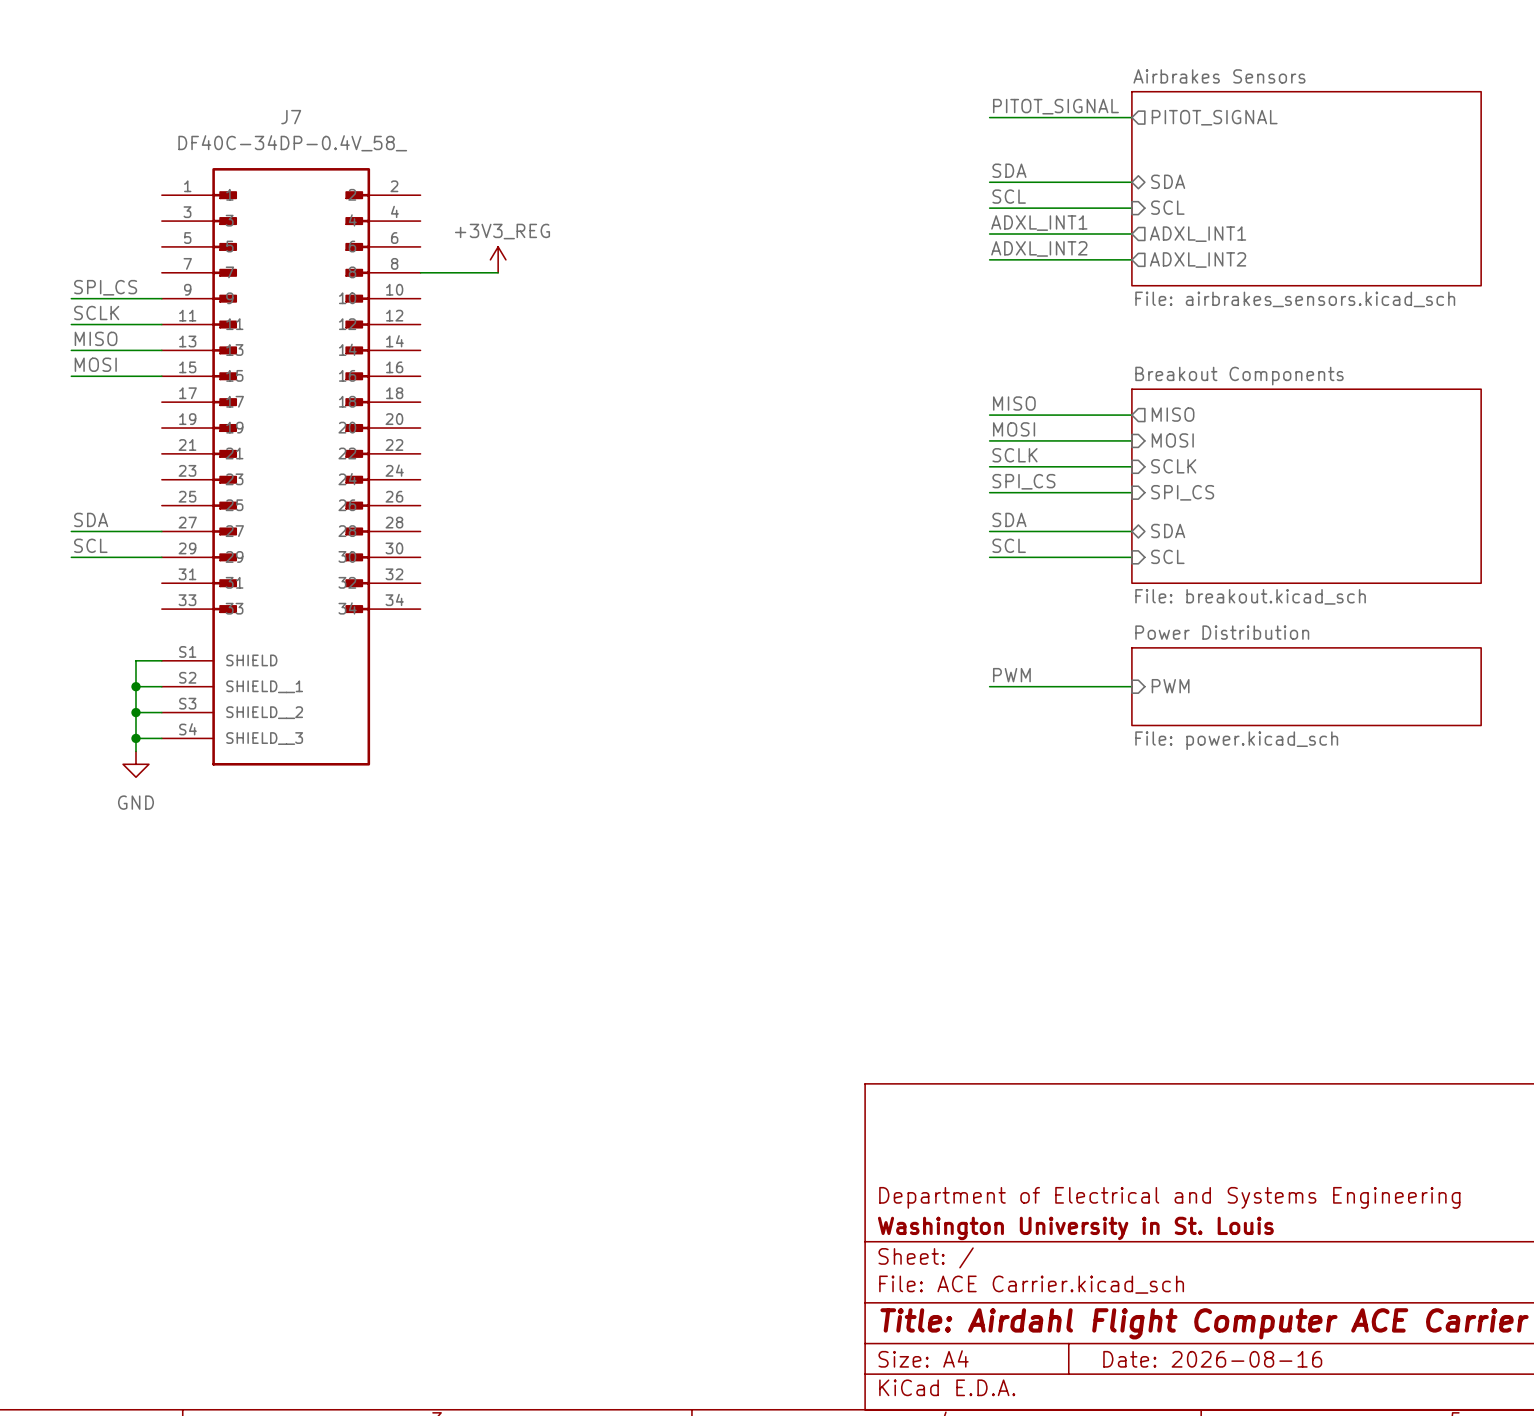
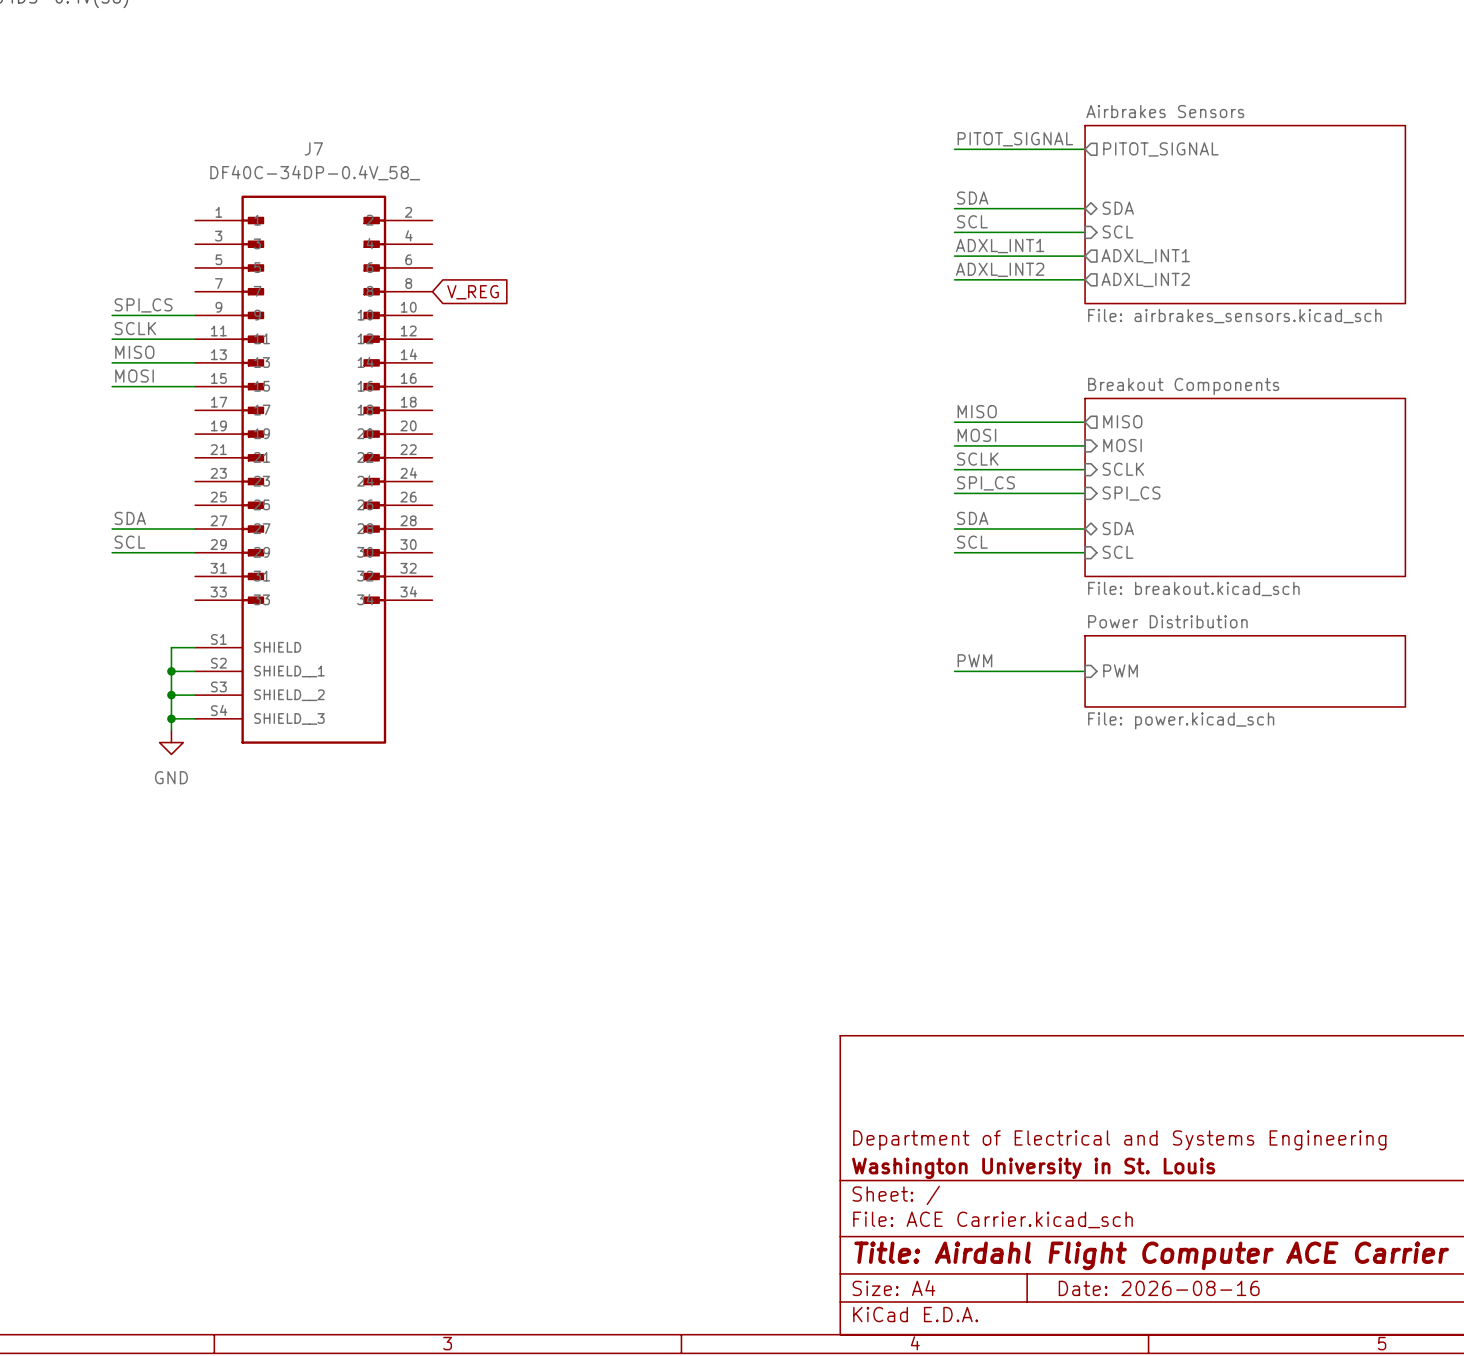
power symbol: +3V3_REG (498, 259) -> none
wire: (420, 272) (498, 272) -> none
global label: none -> V_REG (473, 292)

